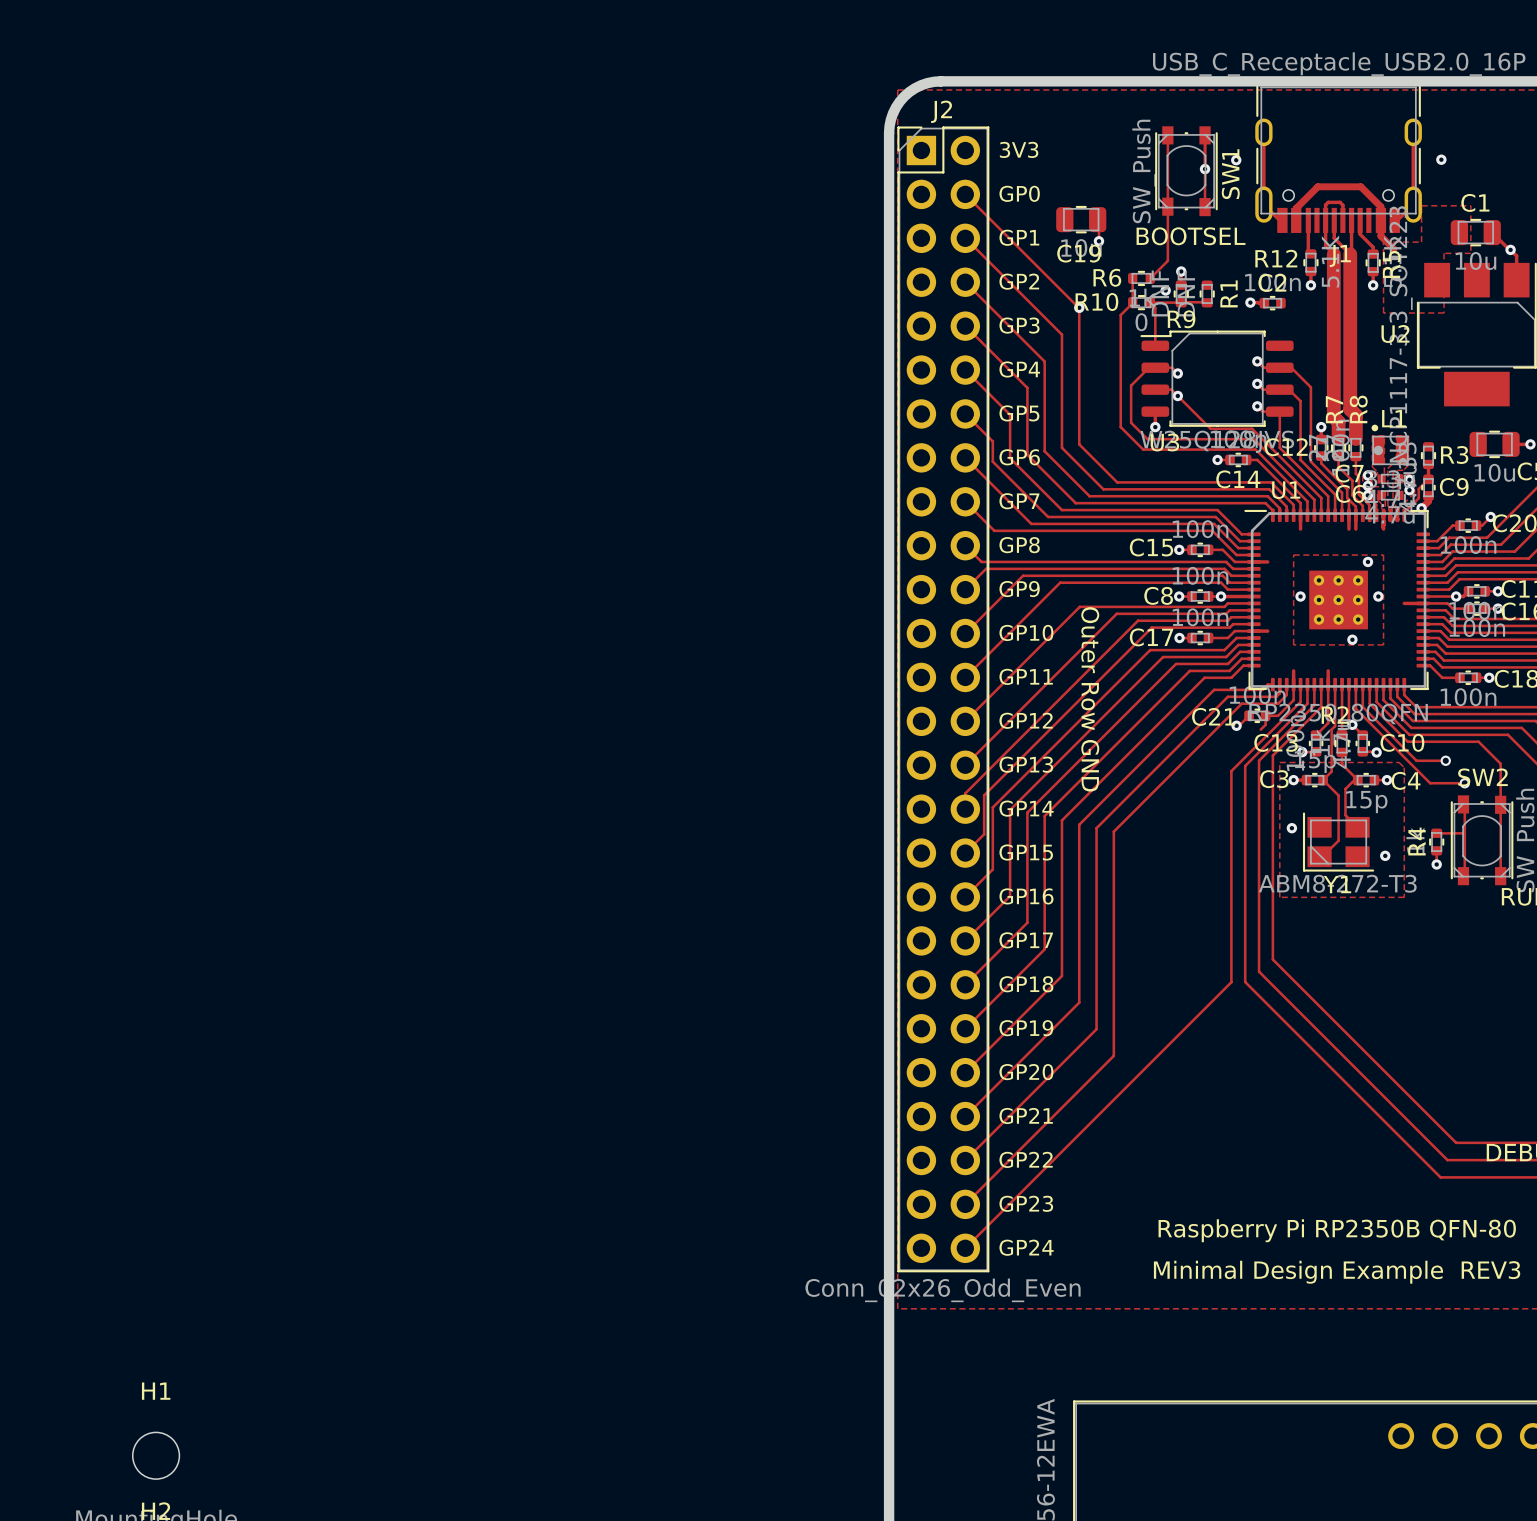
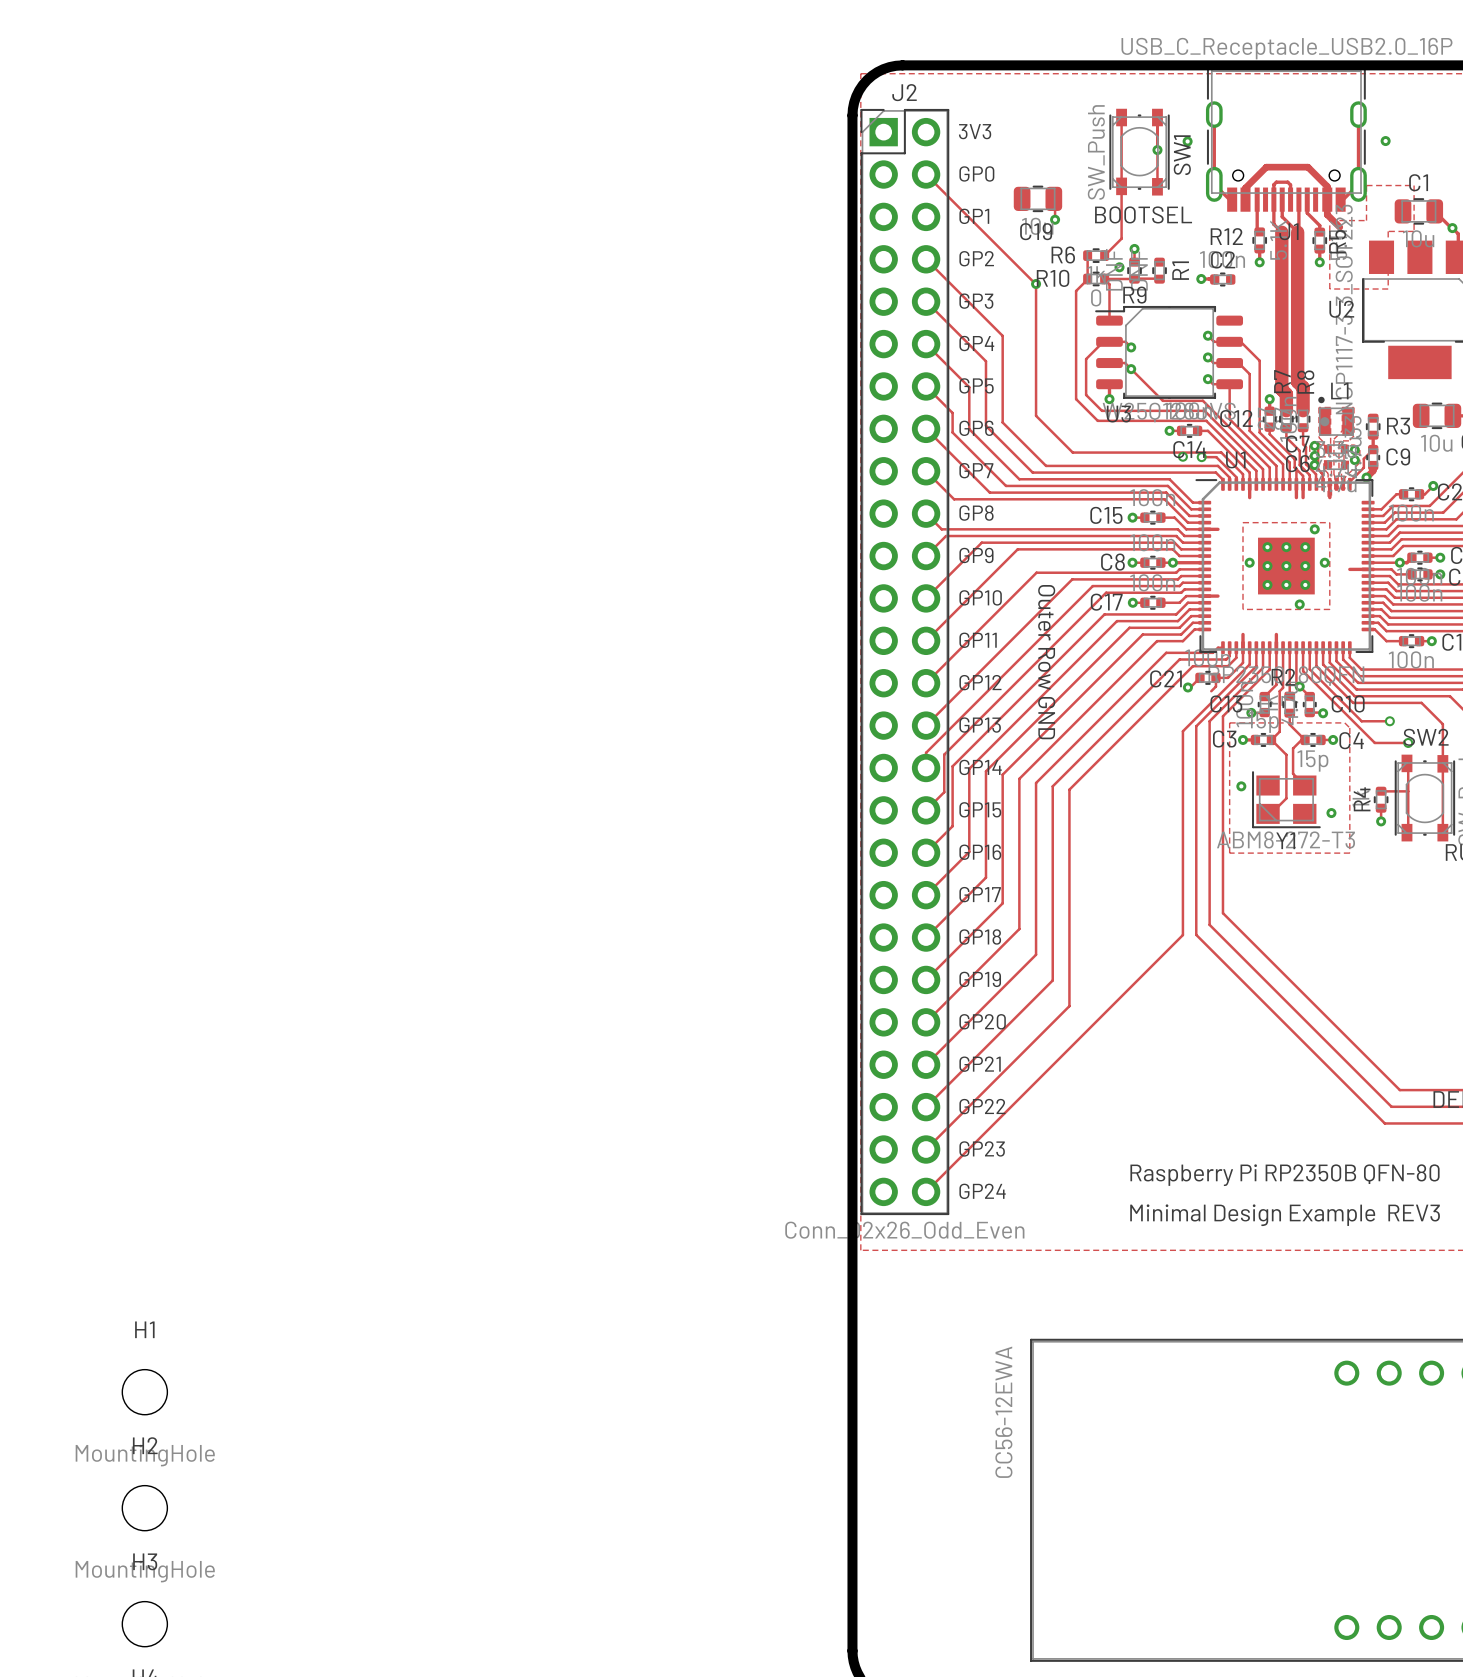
track: (965, 238) (1061, 334) (1061, 447) (1103, 489) (1269, 489) (1286, 507) -> (1201, 457) (1216, 457) (1236, 477)
via: none -> (1182, 456)
via: none -> (1201, 457)

